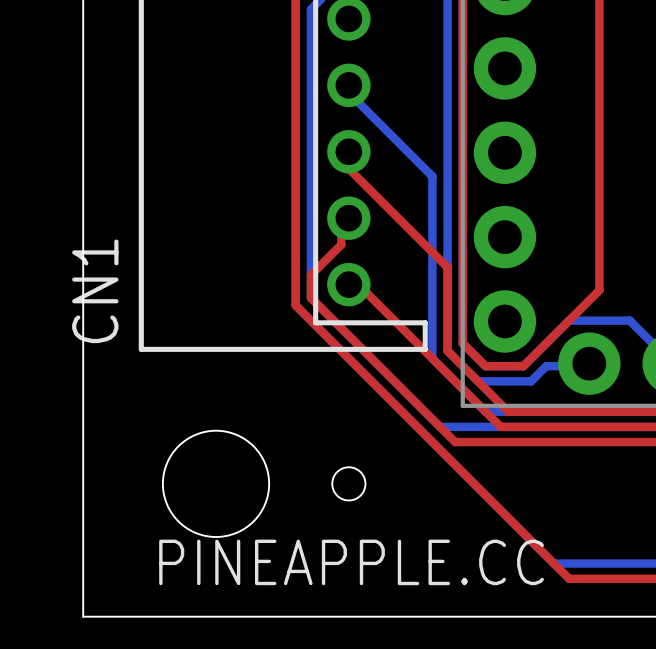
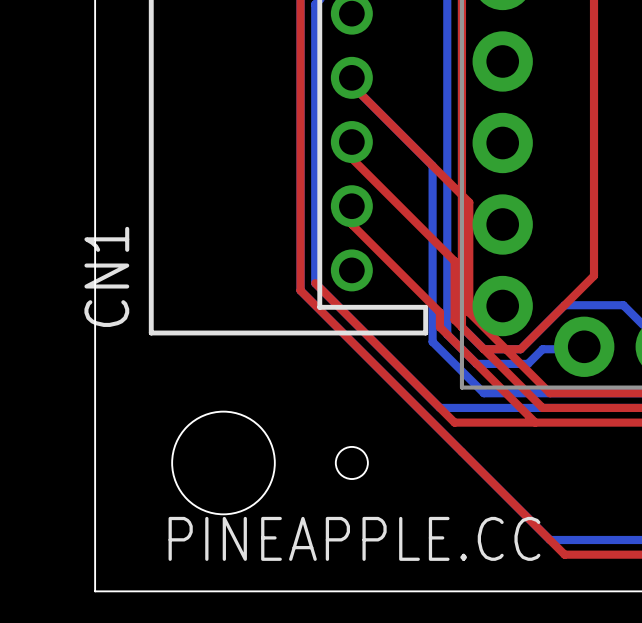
top track: none -> (351, 77) (351, 85) (469, 202) (469, 312) (549, 393)
top track: (348, 218) (341, 221) (341, 244) (310, 275) (310, 297) -> (351, 206) (351, 224) (439, 312) (439, 327) (447, 334)
top track: (447, 267) (447, 350) -> (447, 253) (454, 261) (454, 319) (461, 327)
top track: (348, 284) (348, 290) (364, 290) (500, 426) (546, 426) -> (483, 349) (542, 407)
top track: (508, 411) (553, 411) -> (505, 393) (535, 422)

